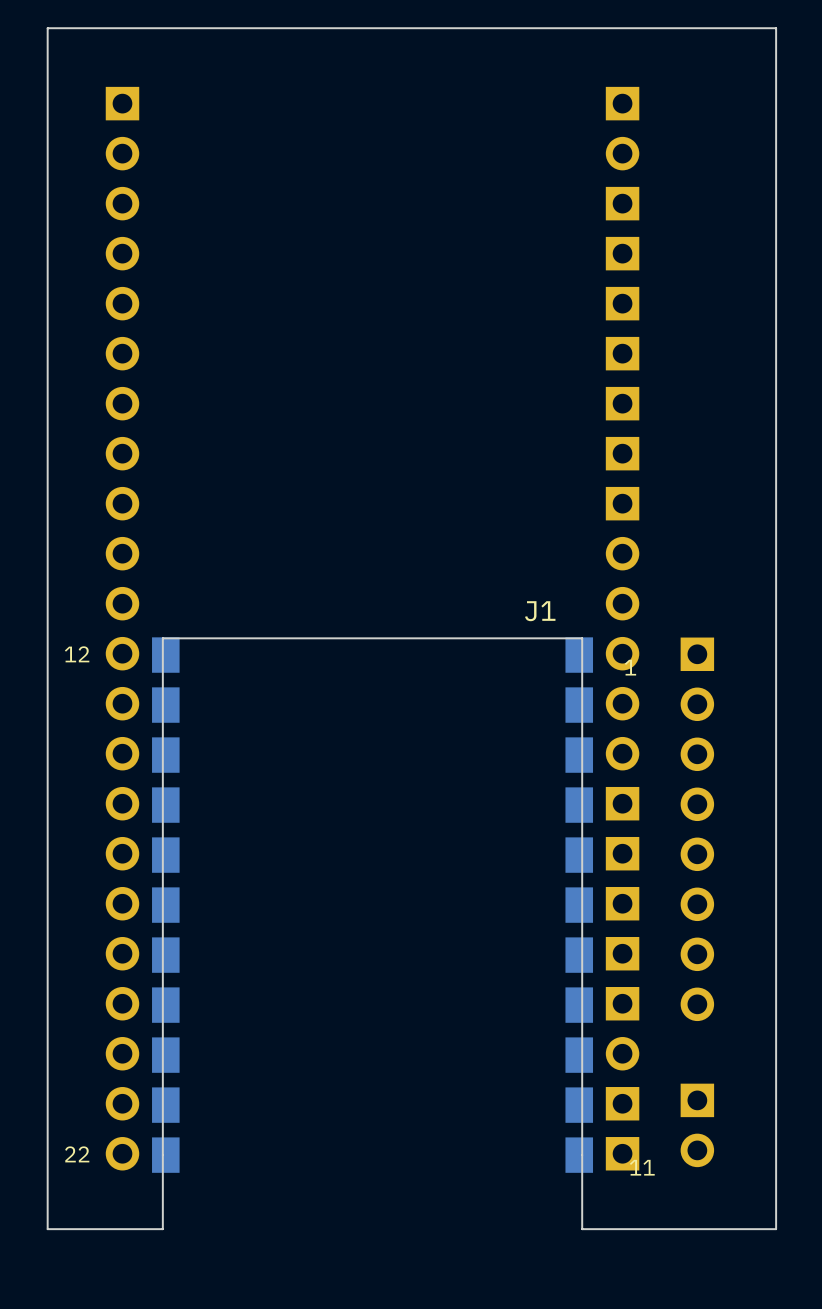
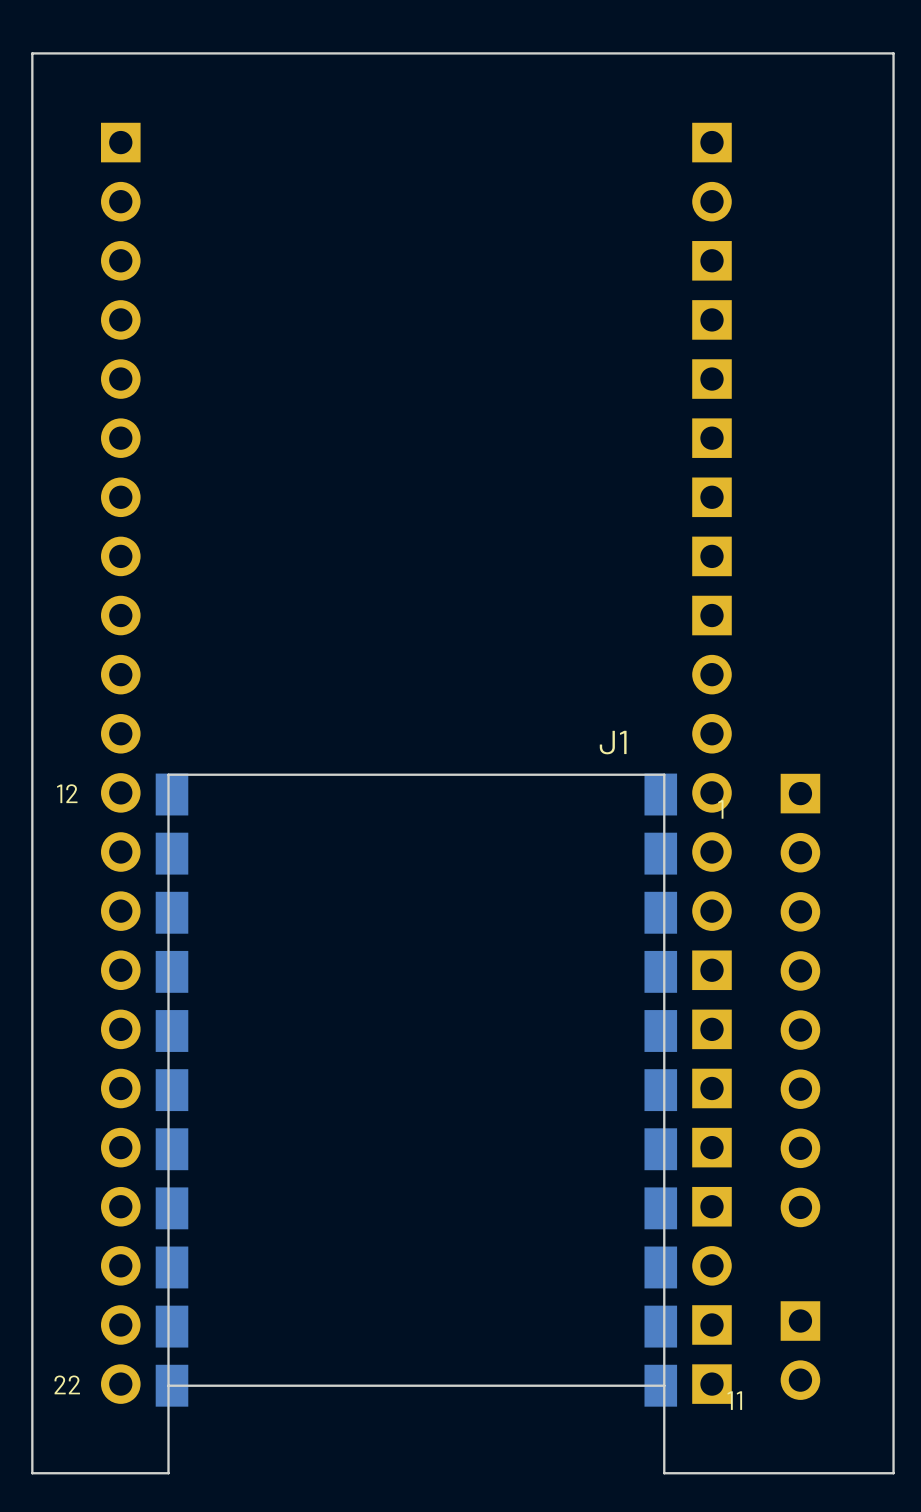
board edge: none -> (664, 1385) (168, 1385)

